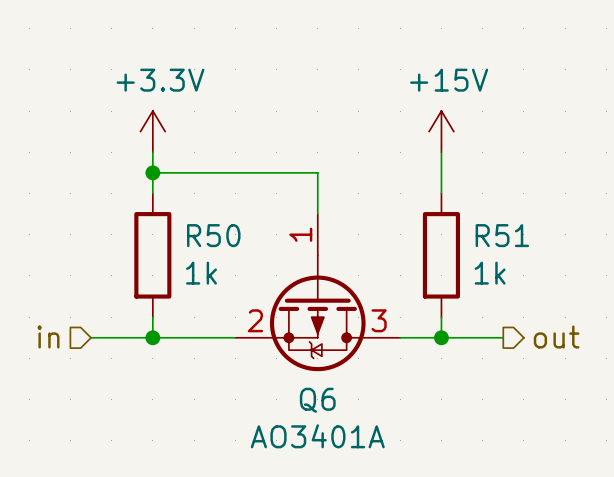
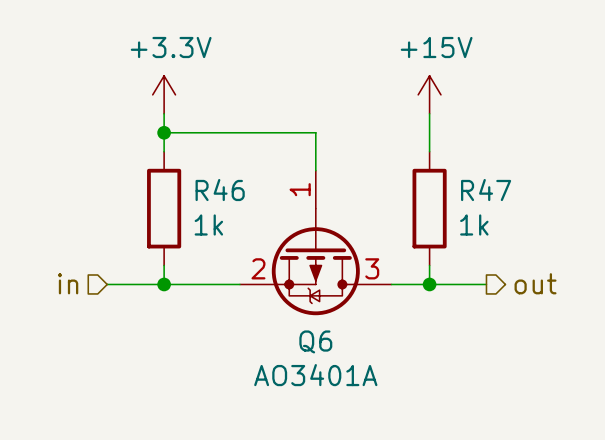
R50 name: R50 (213, 235) -> R46 (220, 190)
R51 name: R51 (502, 235) -> R47 (486, 190)

